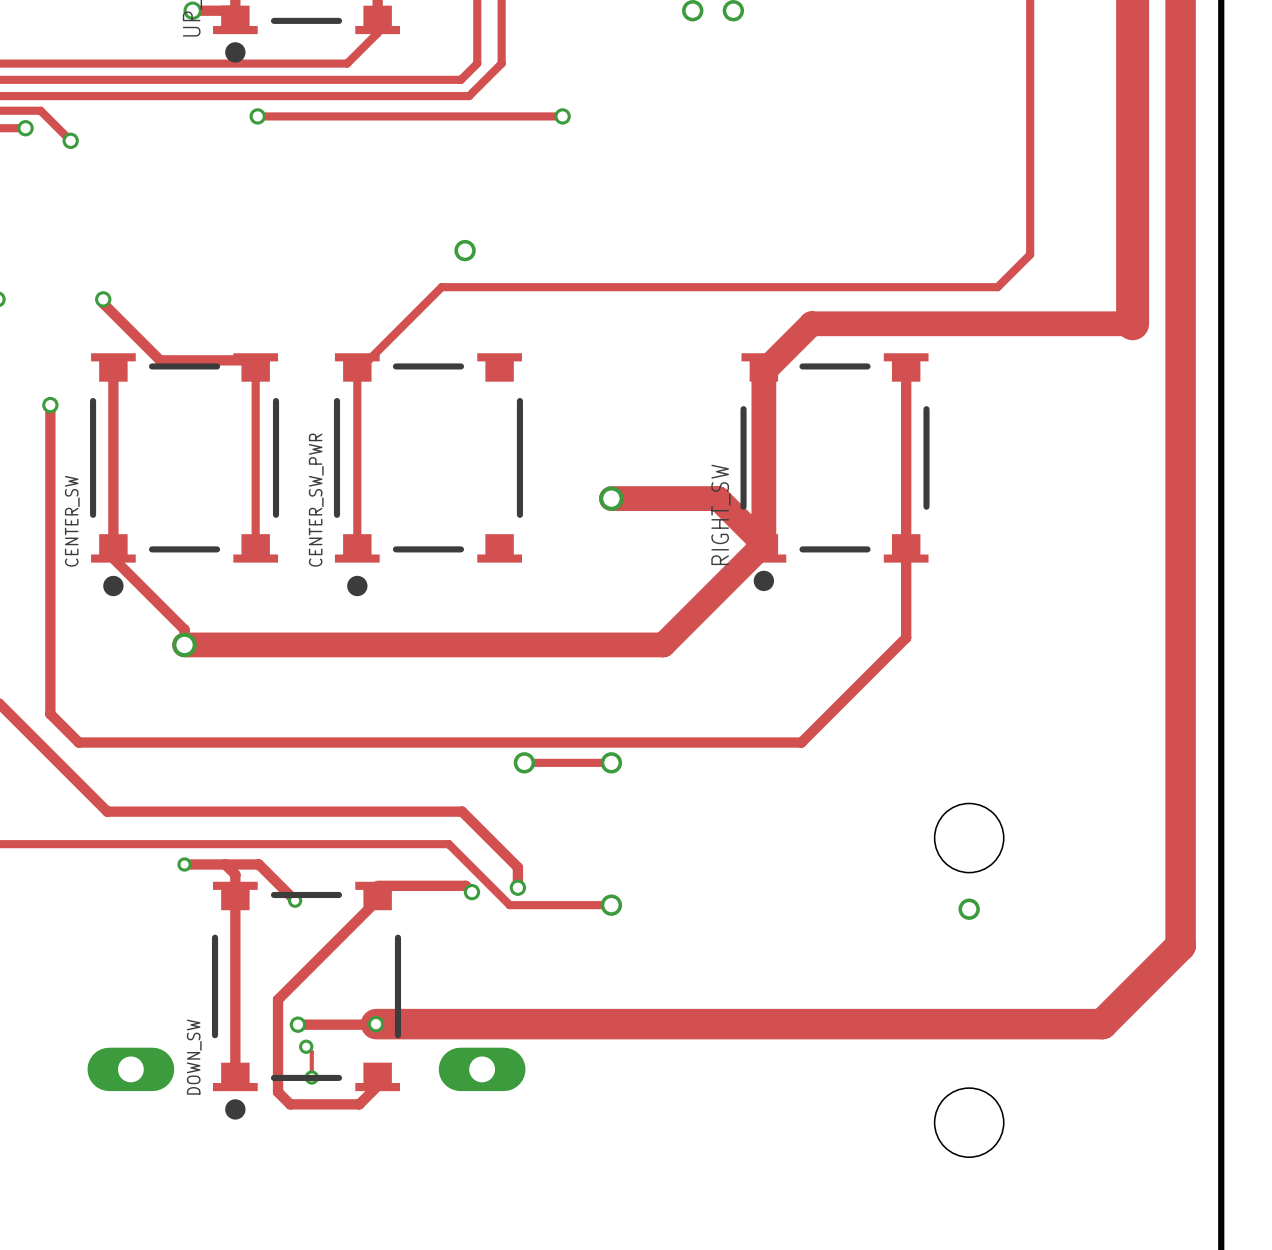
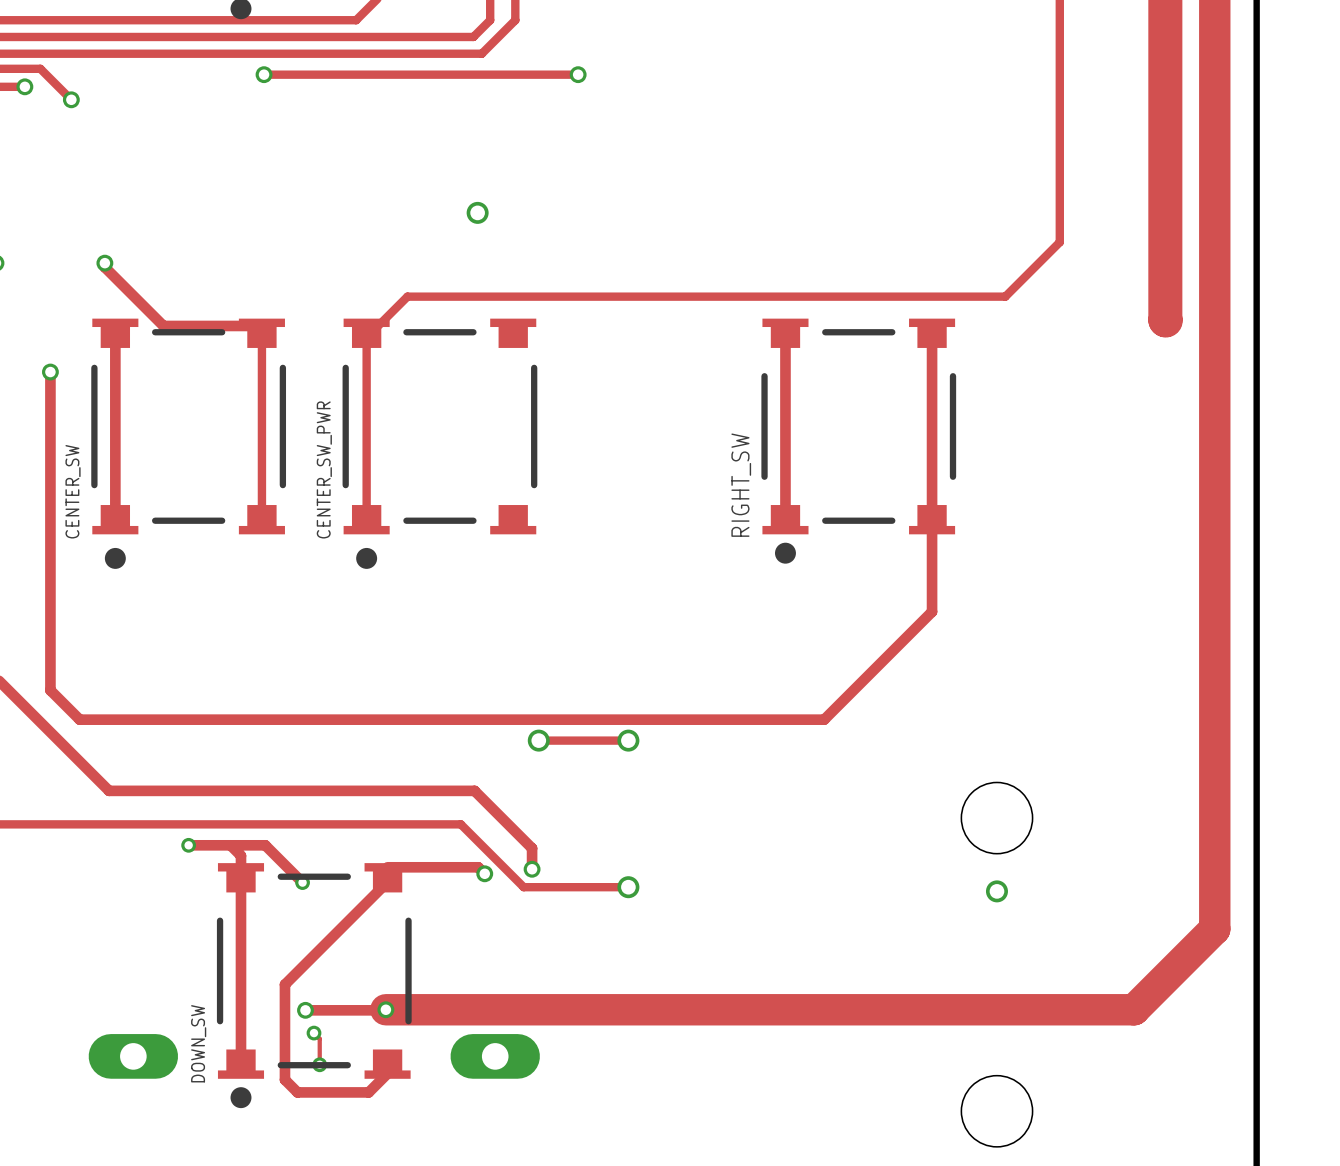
track: (1030, 254) (997, 287) (441, 287) (396, 331) -> (1059, 217) (1059, 242) (1005, 296) (407, 296)
track: (1132, 323) (811, 323) (763, 371) -> (1165, 288) (1165, 320)
track width: thick (763, 371) (763, 544) -> thin (785, 337) (785, 515)
track: (611, 498) (718, 498) (763, 544) (663, 644) (184, 644) (184, 629) (113, 558) -> none
via: (611, 498) -> none
via: (184, 644) -> none

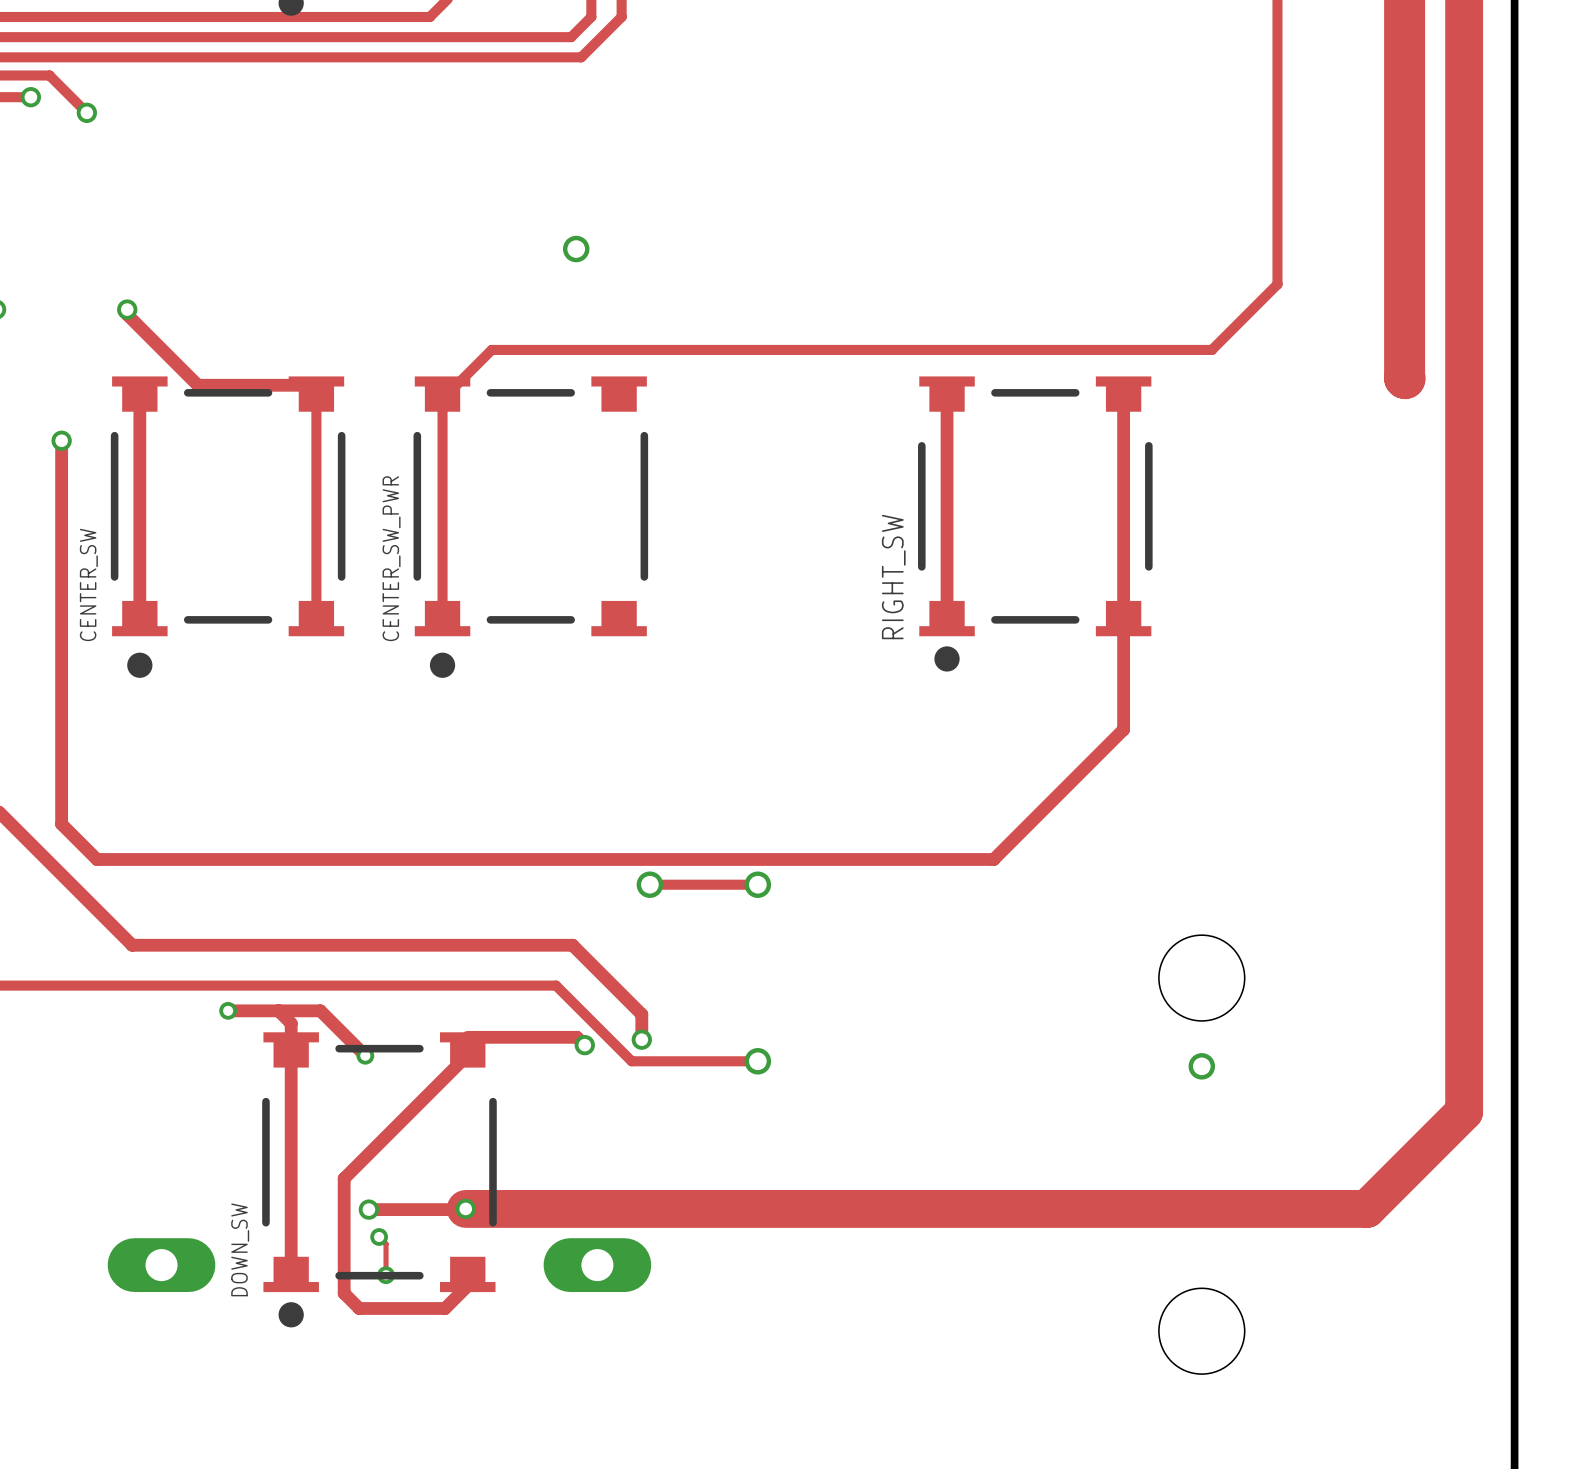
track: (264, 74) (578, 74) -> none
via: (264, 74) -> none
via: (578, 74) -> none

